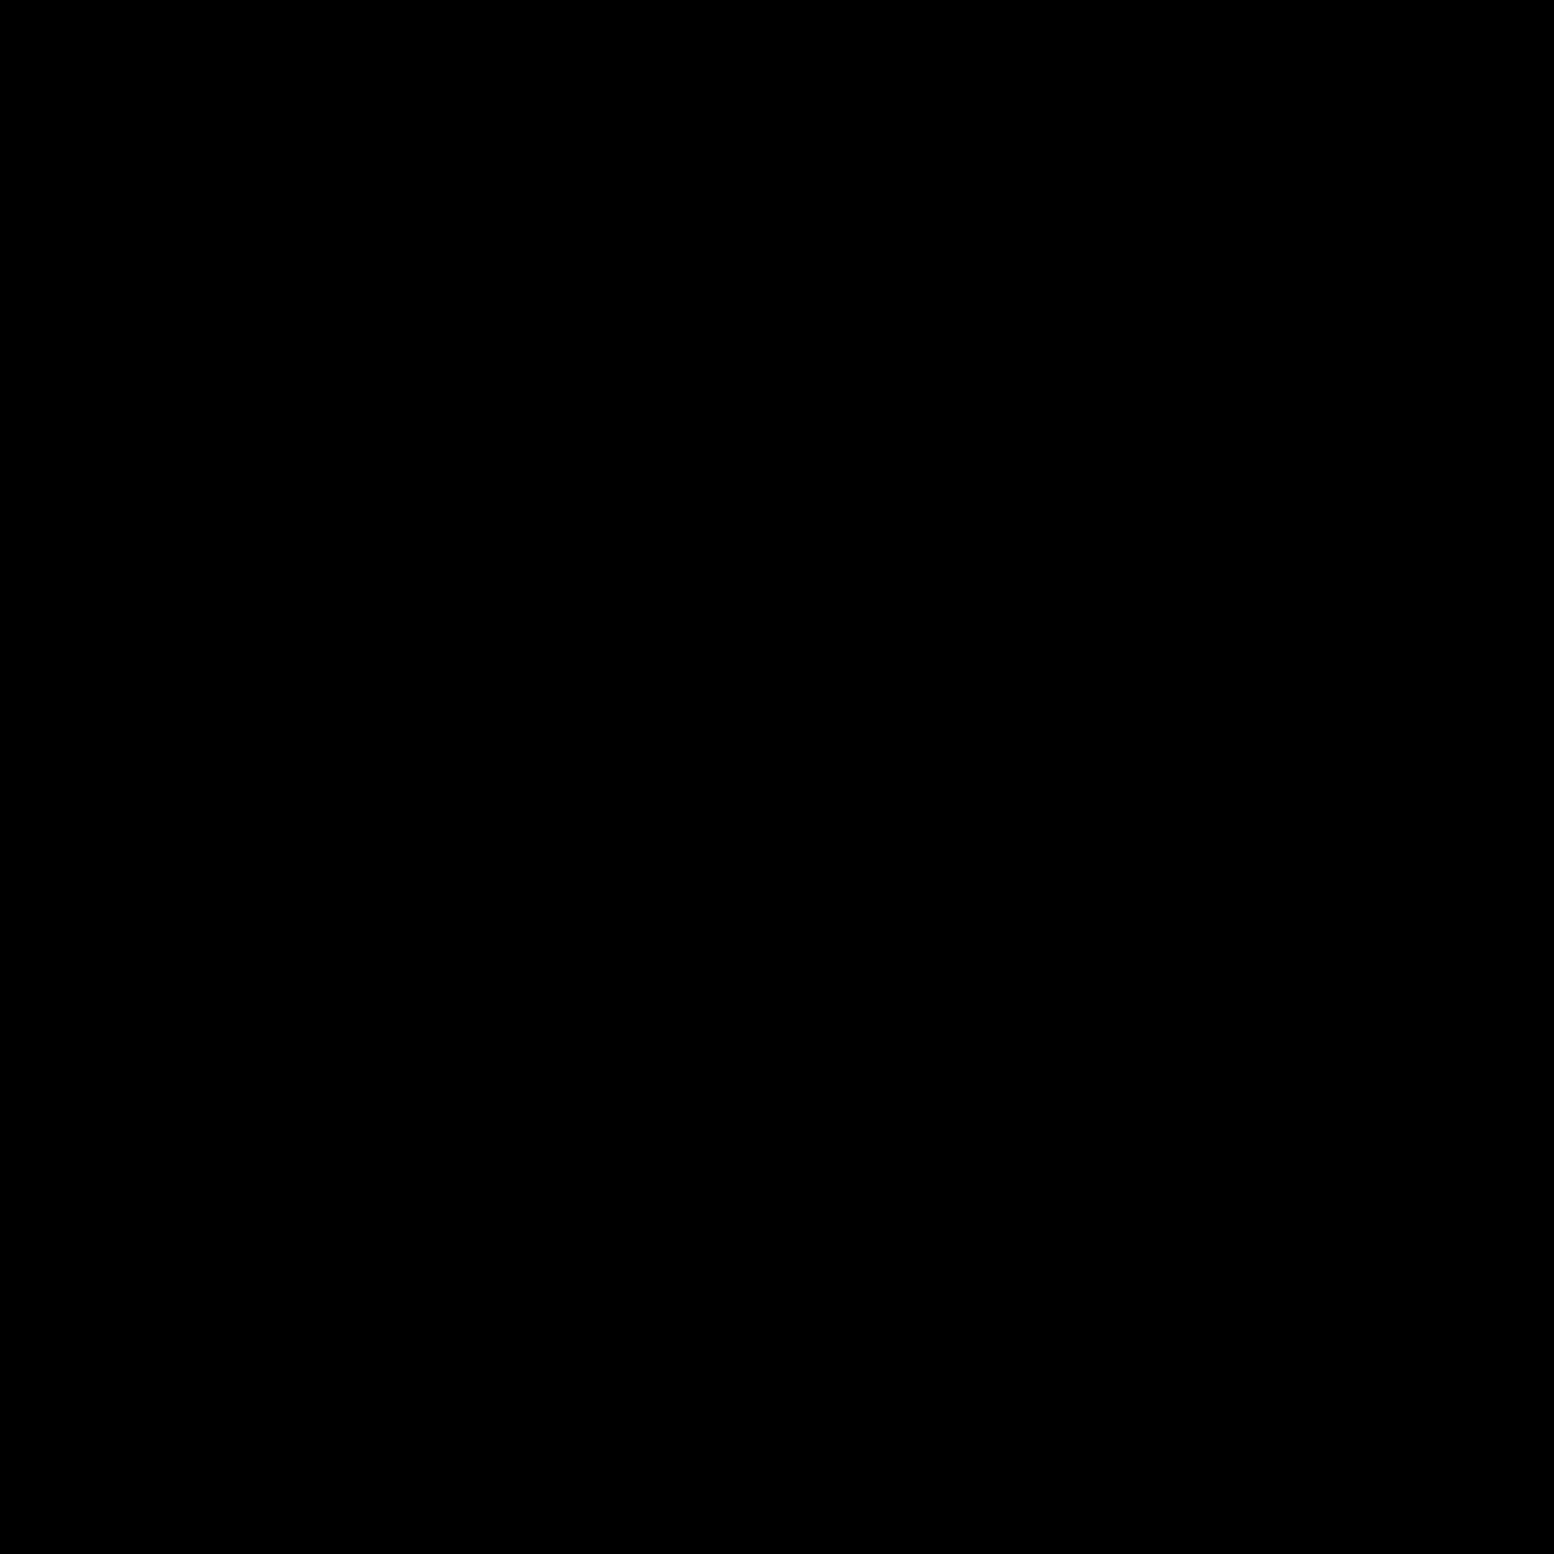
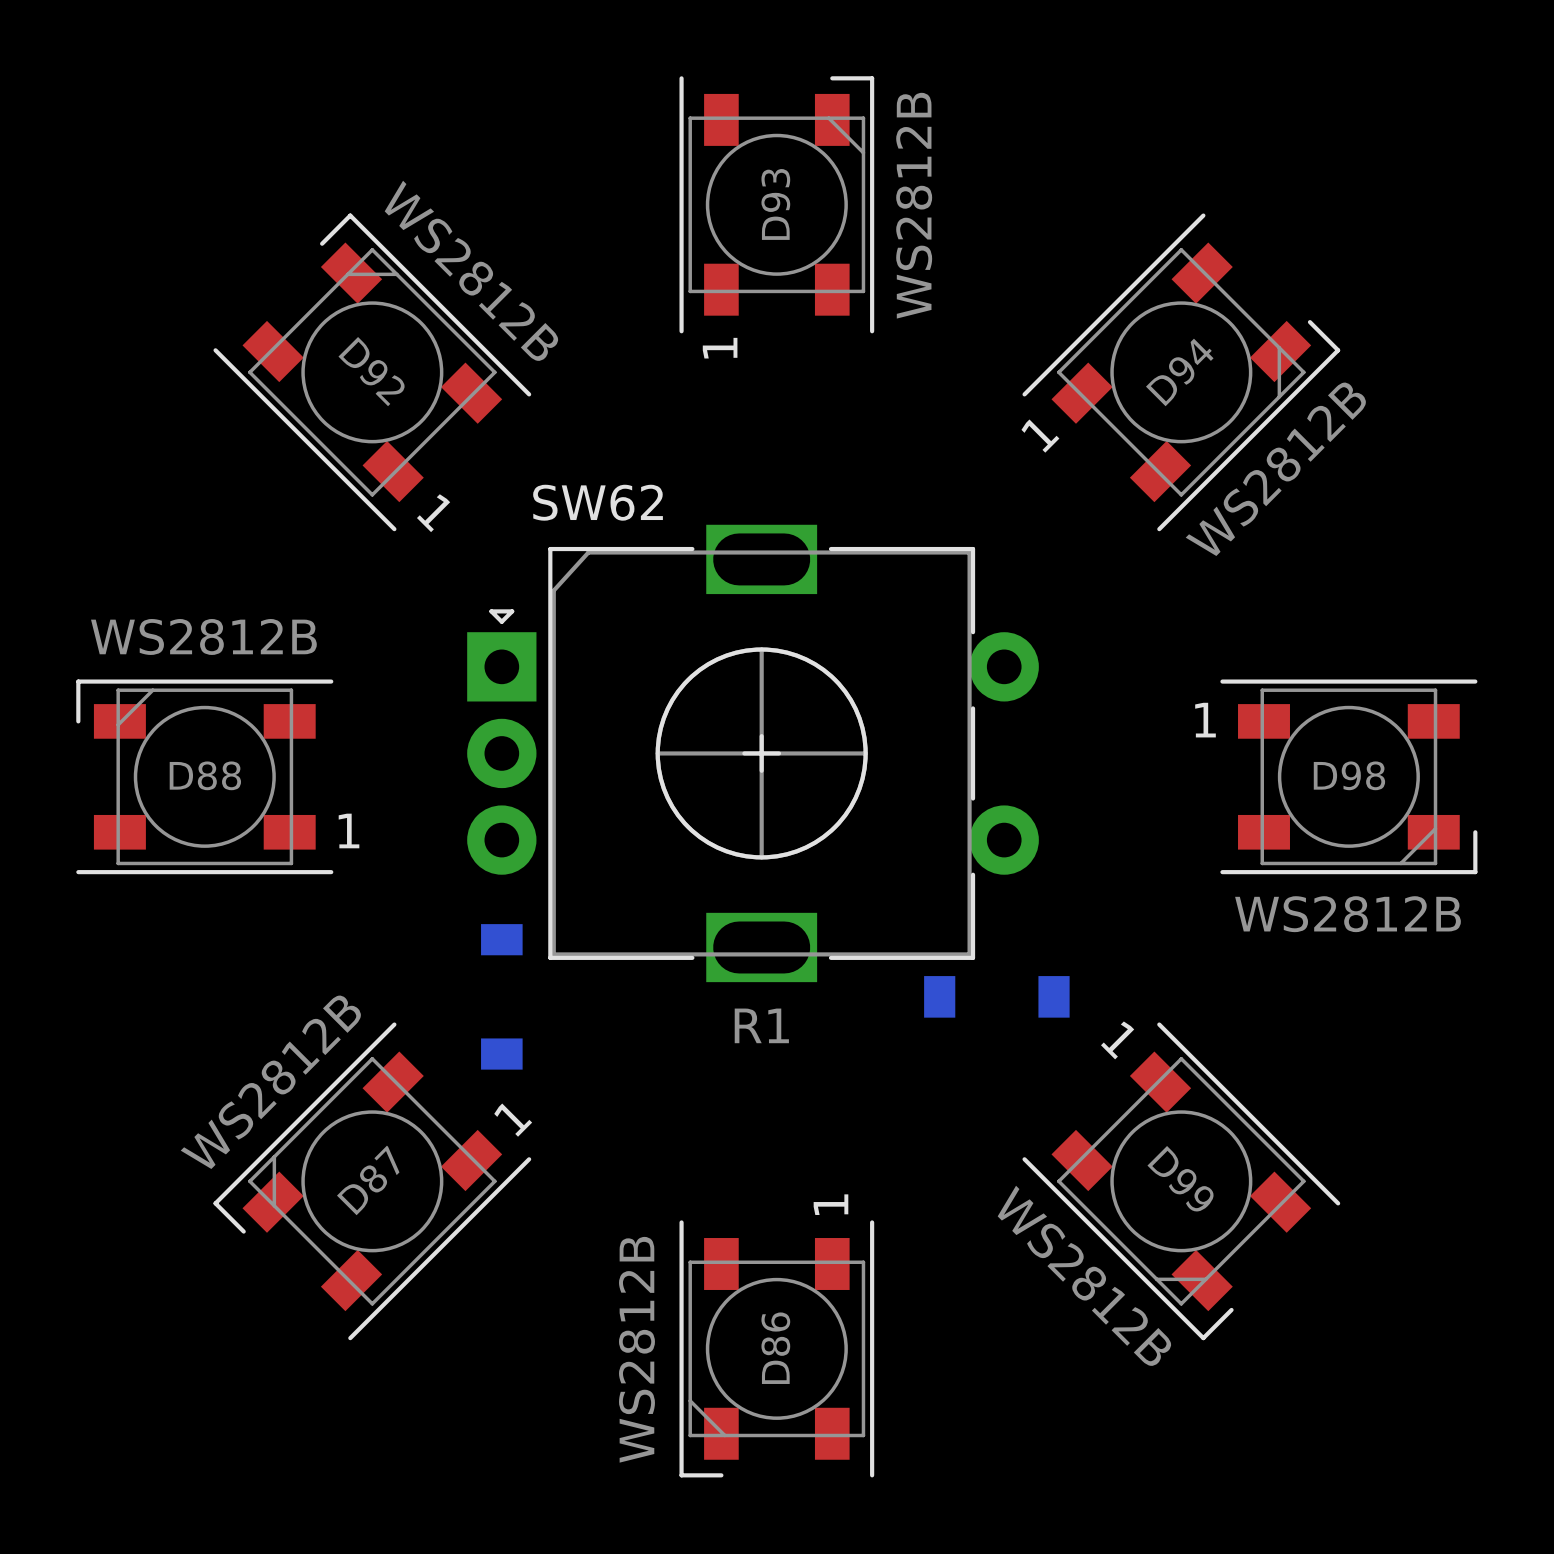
D93: none -> WS2812B (776, 204)
D92: none -> WS2812B (372, 372)
D94: none -> WS2812B (1181, 372)
SW62: none -> R1 (753, 753)
D88: none -> WS2812B (204, 776)
D98: none -> WS2812B (1348, 776)
part: none -> (501, 996)
part: none -> (996, 996)
D87: none -> WS2812B (372, 1181)
D99: none -> WS2812B (1181, 1181)
D86: none -> WS2812B (776, 1348)

